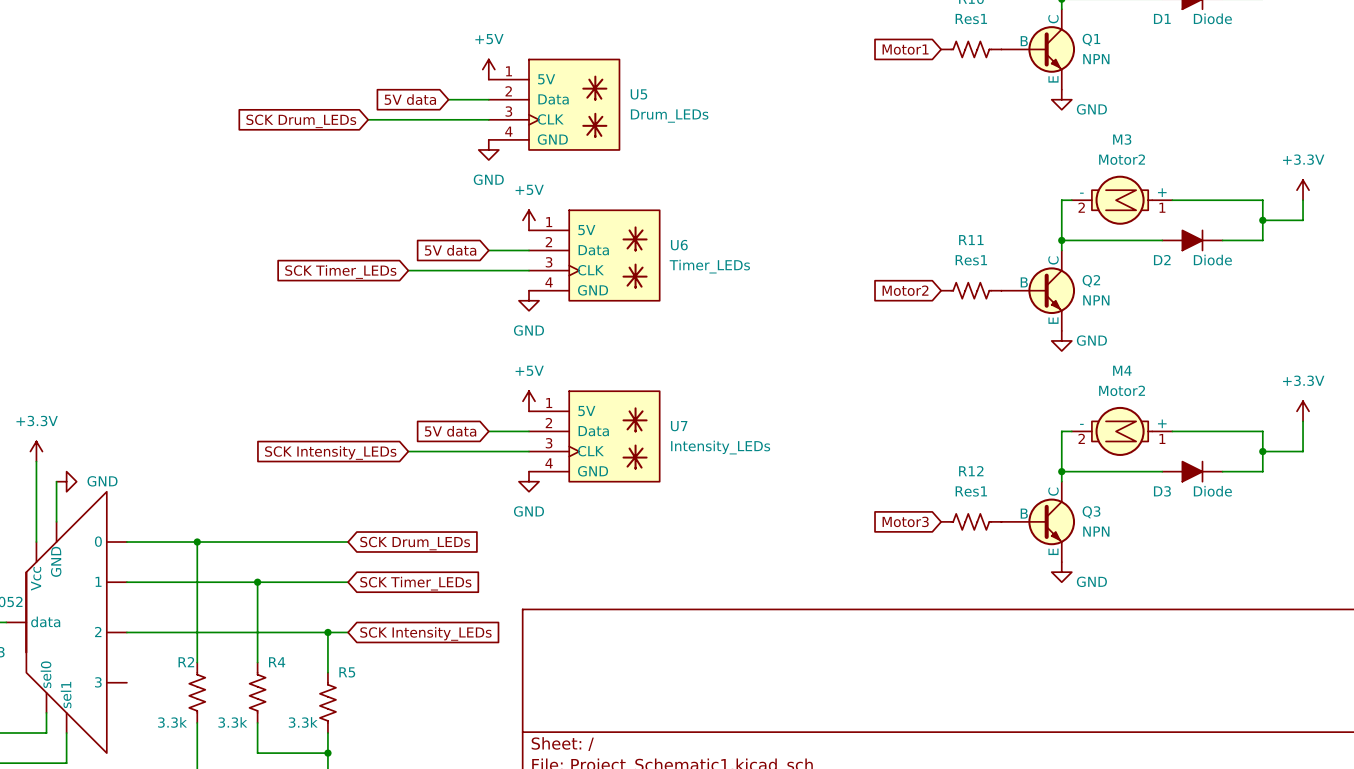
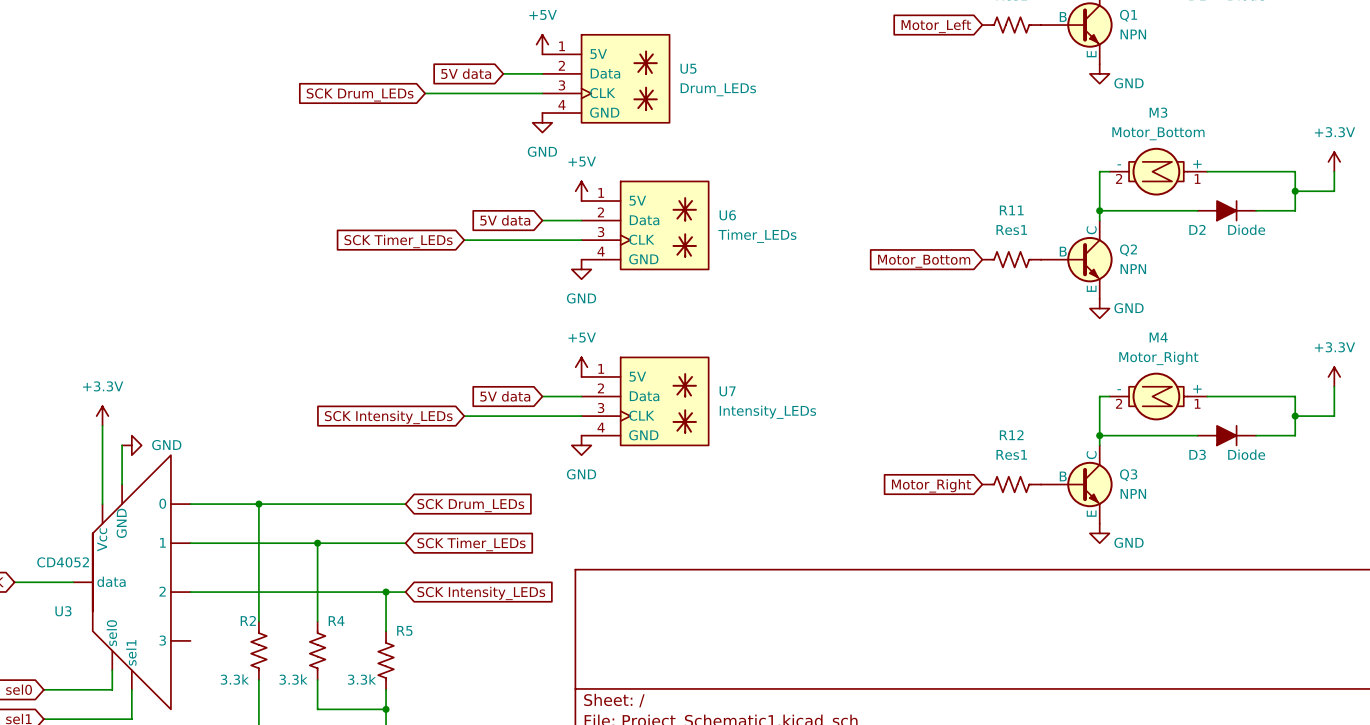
global label: Motor1 (905, 49) -> Motor_Left (936, 26)
M3 value: Motor2 (1122, 159) -> Motor_Bottom (1158, 133)
global label: Motor2 (905, 290) -> Motor_Bottom (924, 261)
M4 value: Motor2 (1122, 390) -> Motor_Right (1158, 358)
global label: Motor3 (905, 521) -> Motor_Right (931, 485)

